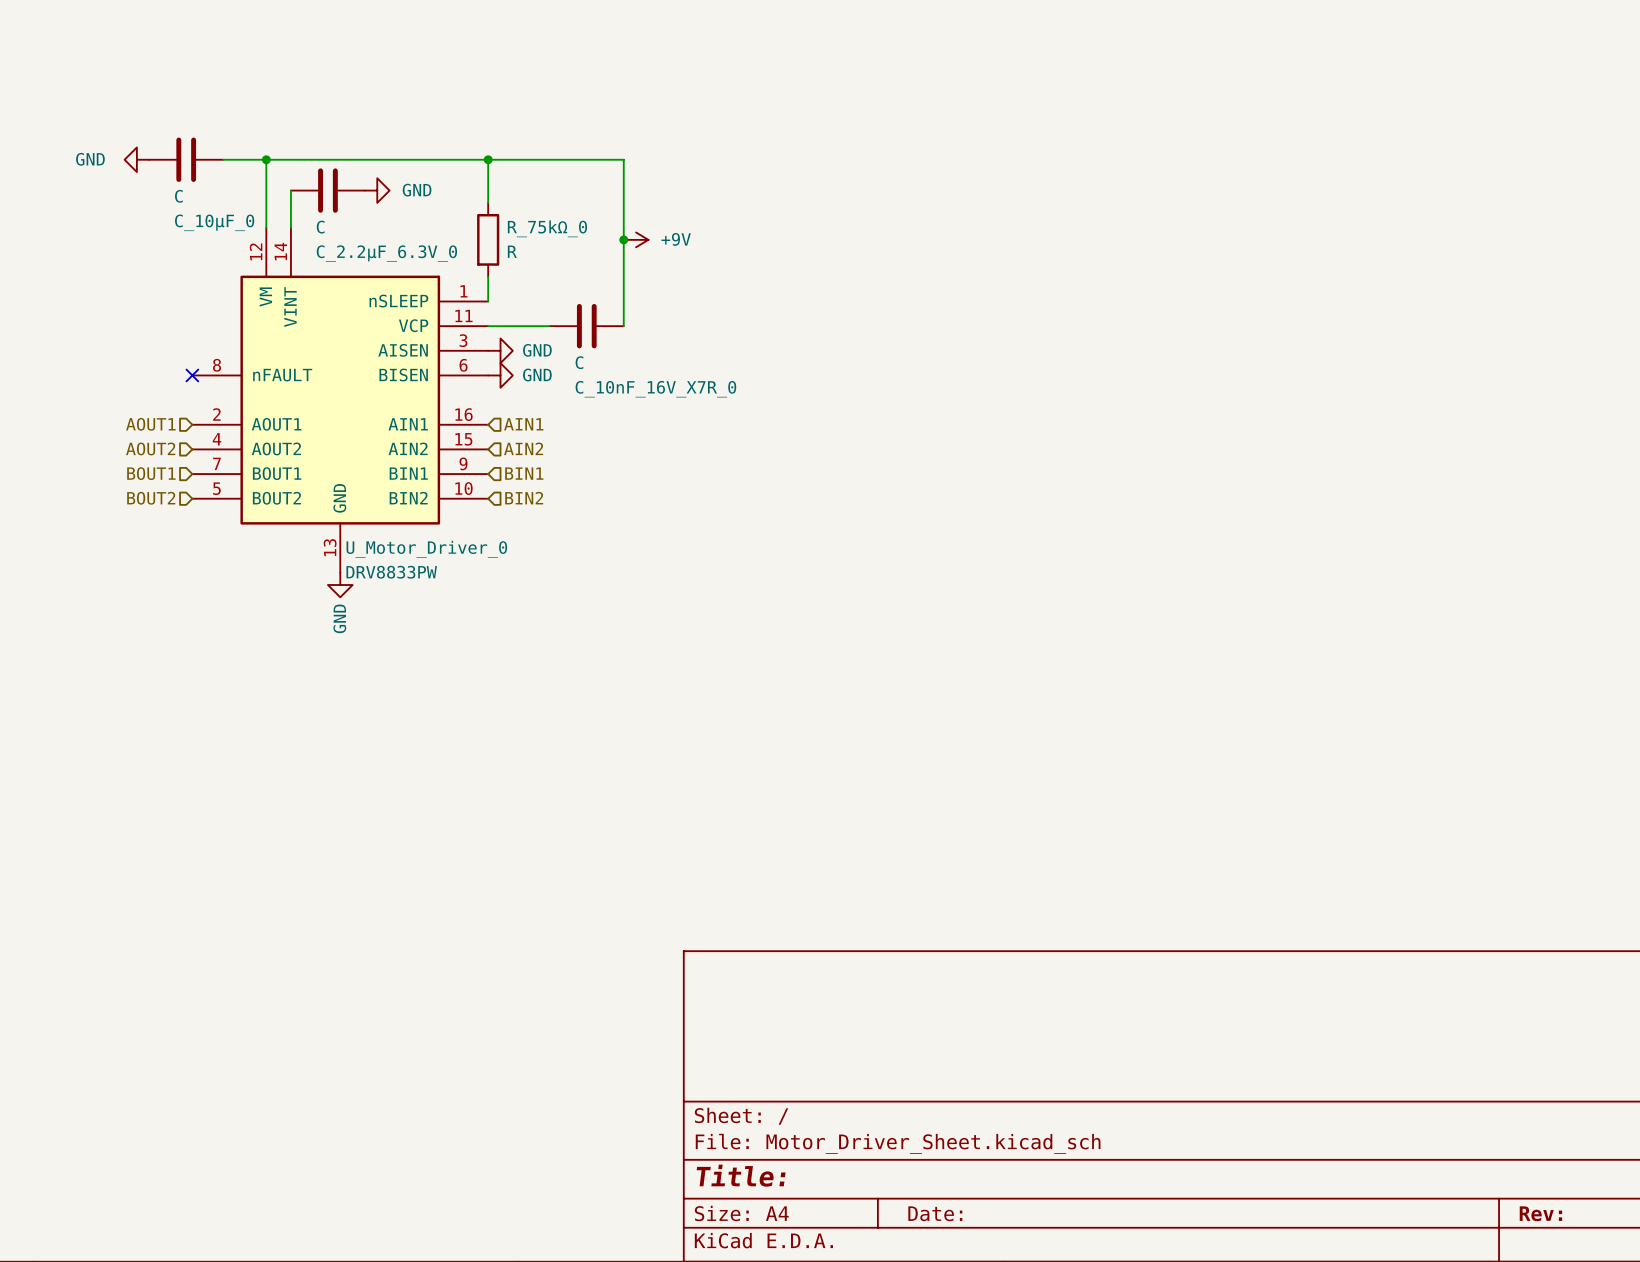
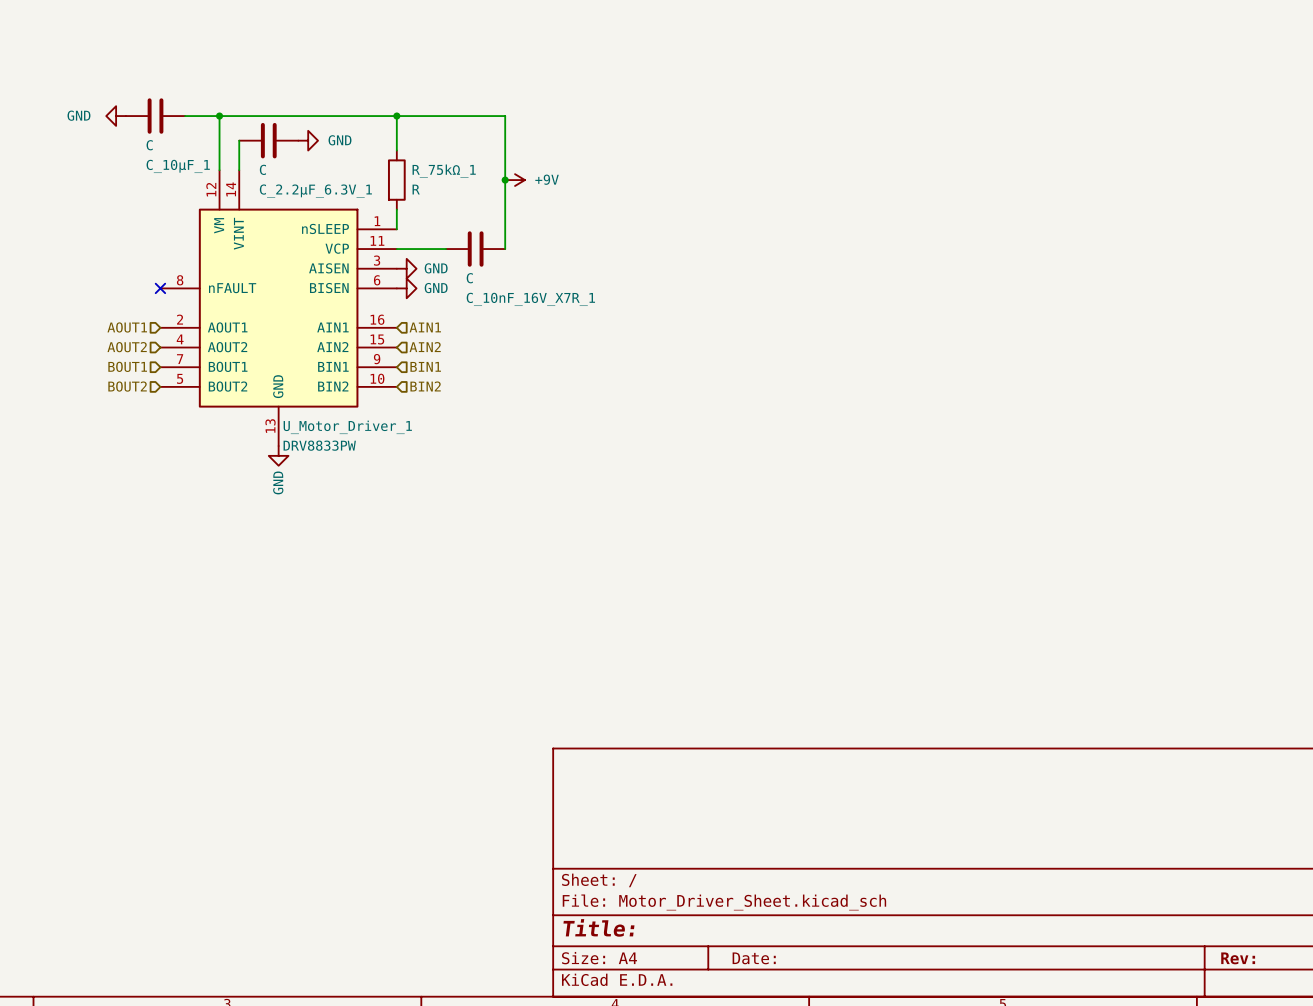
C_10μF_0 name: C_10μF_0 (214, 222) -> C_10μF_1 (178, 166)
R_75kΩ_0 name: R_75kΩ_0 (547, 228) -> R_75kΩ_1 (444, 171)
C_2.2μF_6.3V_0 name: C_2.2μF_6.3V_0 (386, 253) -> C_2.2μF_6.3V_1 (315, 191)
C_10nF_16V_X7R_0 name: C_10nF_16V_X7R_0 (655, 389) -> C_10nF_16V_X7R_1 (530, 299)
U_Motor_Driver_0 name: U_Motor_Driver_0 (426, 549) -> U_Motor_Driver_1 (347, 427)

